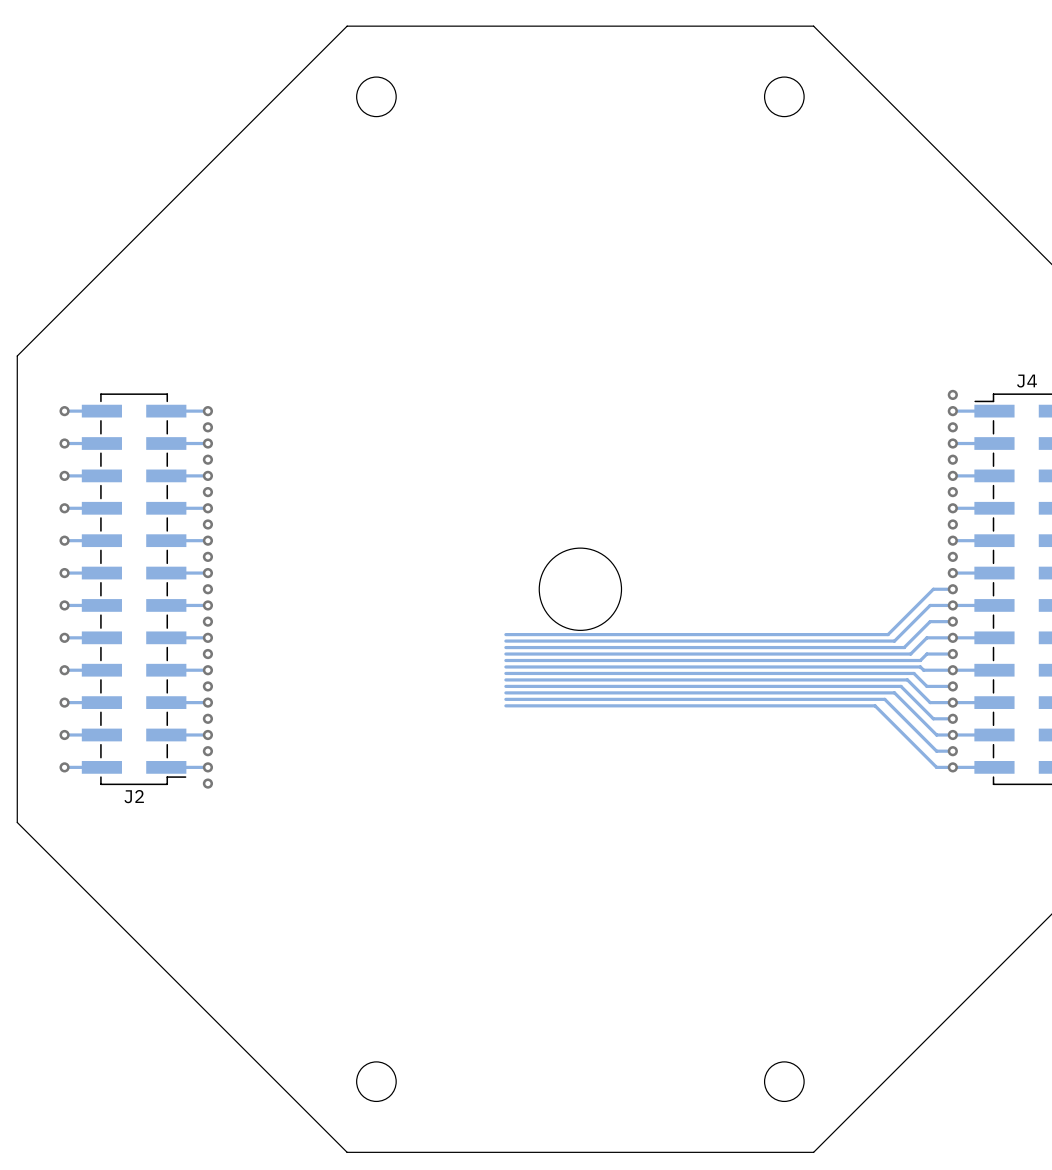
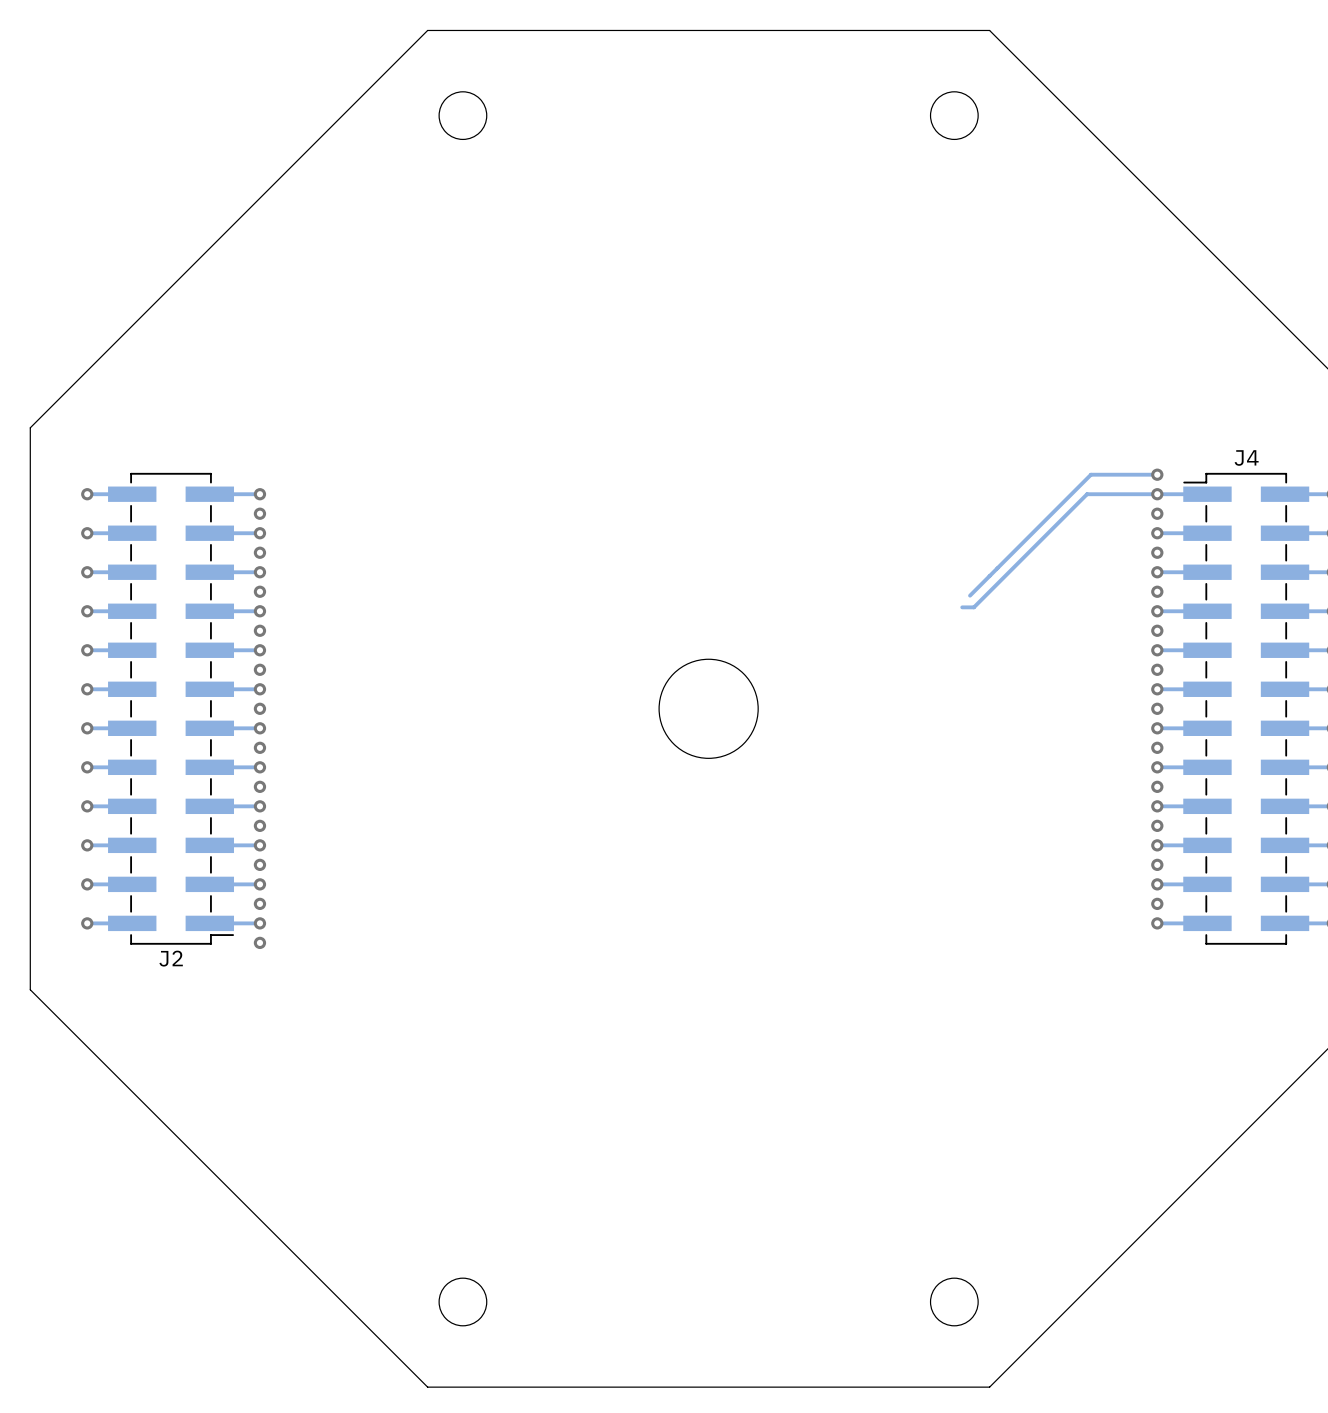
track: none -> (1157, 474) (1090, 474) (970, 595)
track: none -> (1157, 494) (1087, 494) (973, 607) (962, 607)
track: (952, 589) (933, 589) (888, 634) (505, 634) -> none
track: (952, 605) (930, 605) (894, 641) (505, 641) -> none
track: (952, 621) (930, 621) (904, 647) (505, 647) -> none
track: (952, 637) (926, 637) (910, 654) (505, 654) -> none
track: (952, 654) (926, 654) (920, 660) (505, 660) -> none
track: (505, 666) (920, 666) (923, 670) (952, 670) -> none
track: (505, 673) (913, 673) (926, 686) (952, 686) -> none
track: (505, 679) (907, 679) (930, 702) (952, 702) -> none
track: (505, 686) (901, 686) (933, 718) (952, 718) -> none
track: (505, 692) (894, 692) (936, 734) (952, 734) -> none
track: (505, 699) (884, 699) (936, 751) (952, 751) -> none
track: (505, 705) (875, 705) (936, 767) (952, 767) -> none

